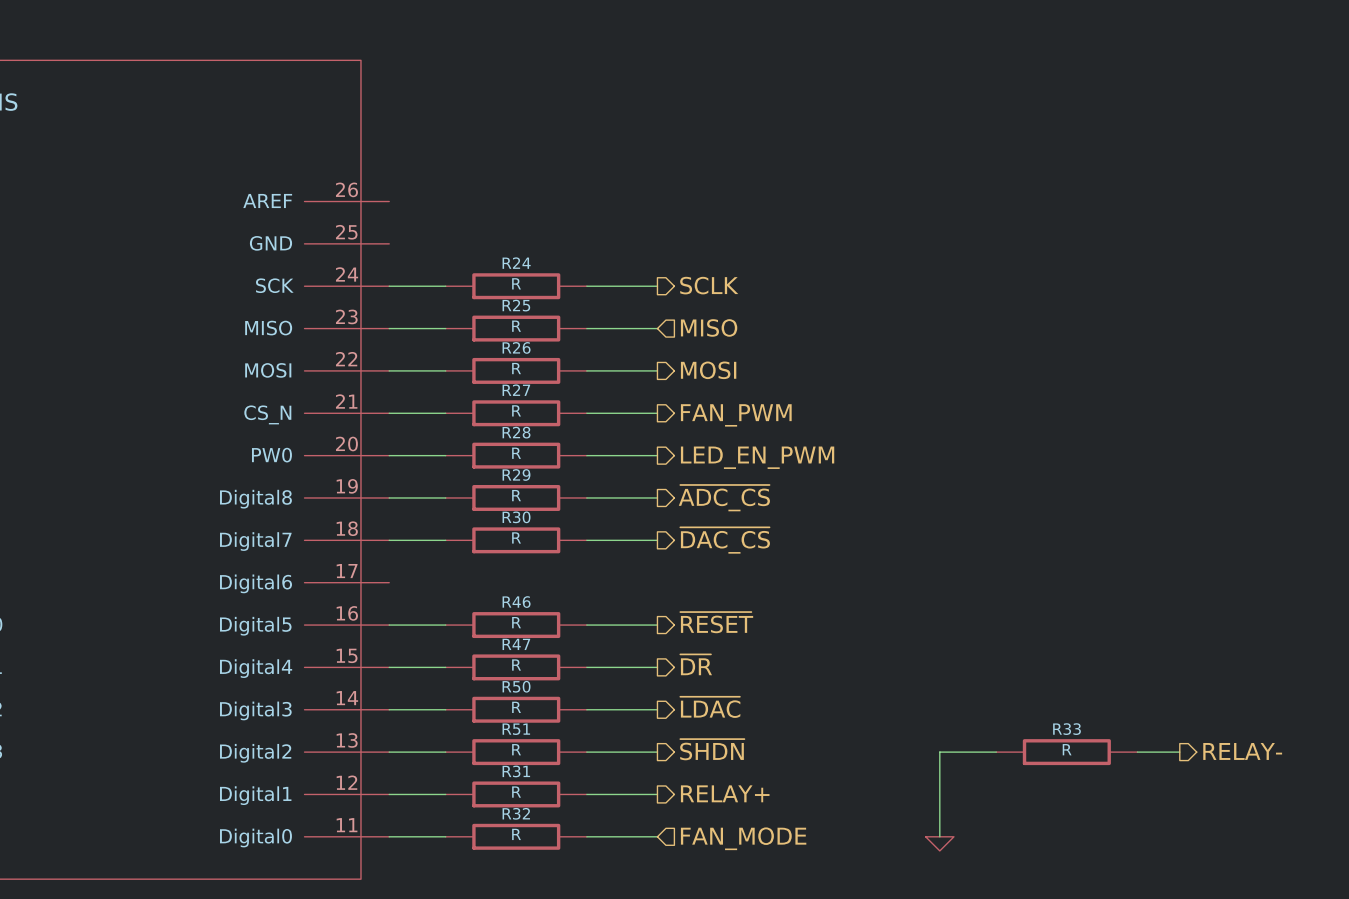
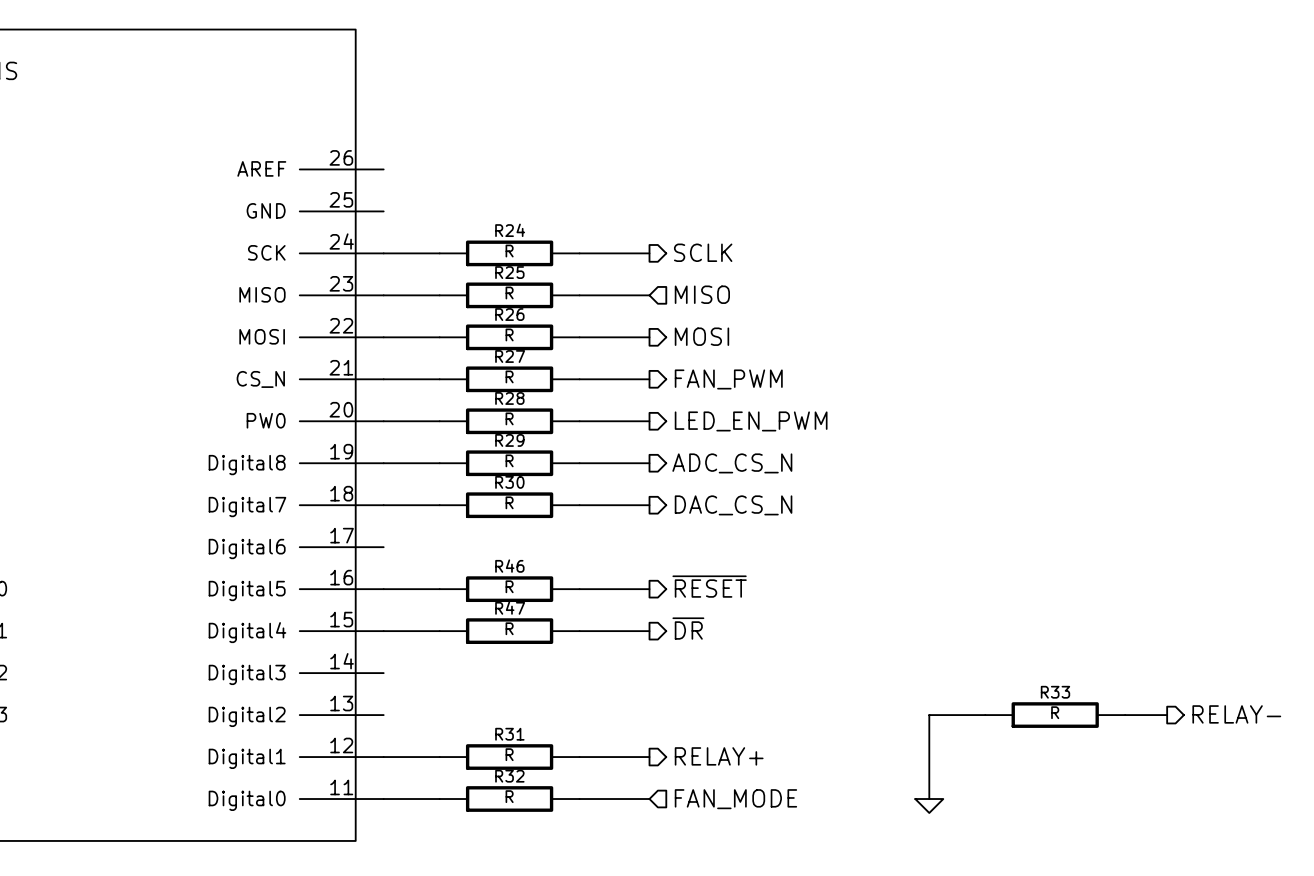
hierarchical label: ~{ADC_CS} (724, 498) -> ADC_CS_N (732, 463)
hierarchical label: ~{DAC_CS} (725, 540) -> DAC_CS_N (733, 505)
hierarchical label: ~{LDAC} (710, 707) -> none
wire: (389, 709) (445, 709) -> none
R50: R (516, 709) -> none
wire: (586, 709) (657, 709) -> none
hierarchical label: ~{SHDN} (712, 749) -> none
wire: (389, 752) (445, 752) -> none
R51: R (516, 752) -> none
wire: (586, 752) (657, 752) -> none

